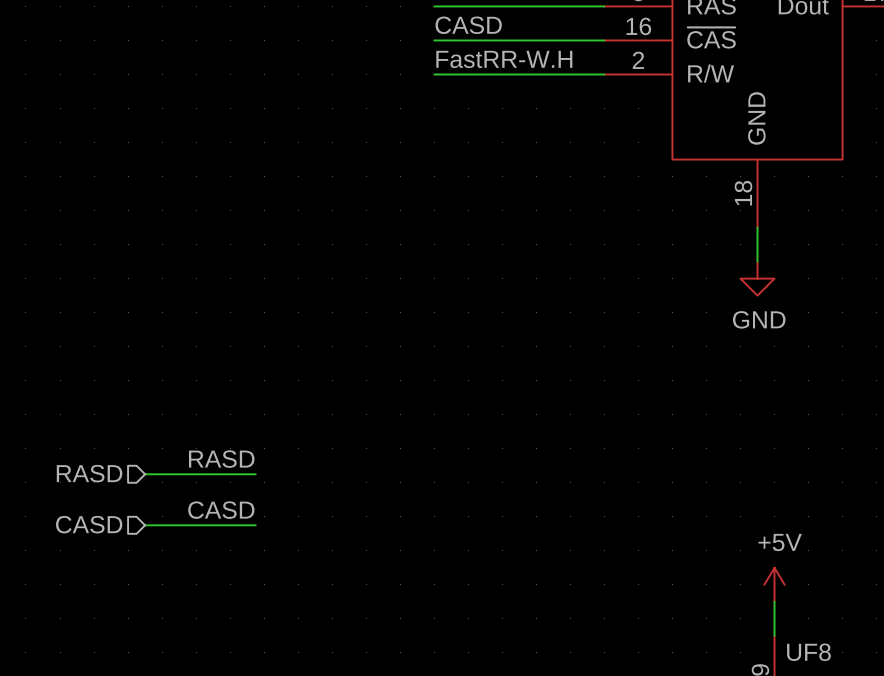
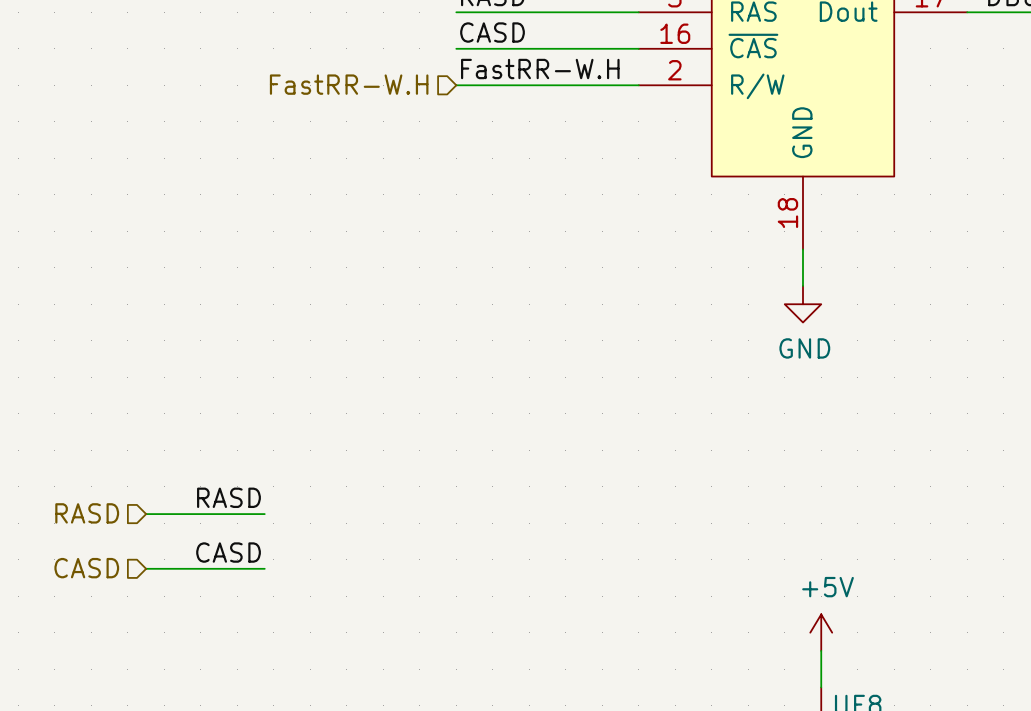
hierarchical label: none -> FastRR-W.H (349, 84)

